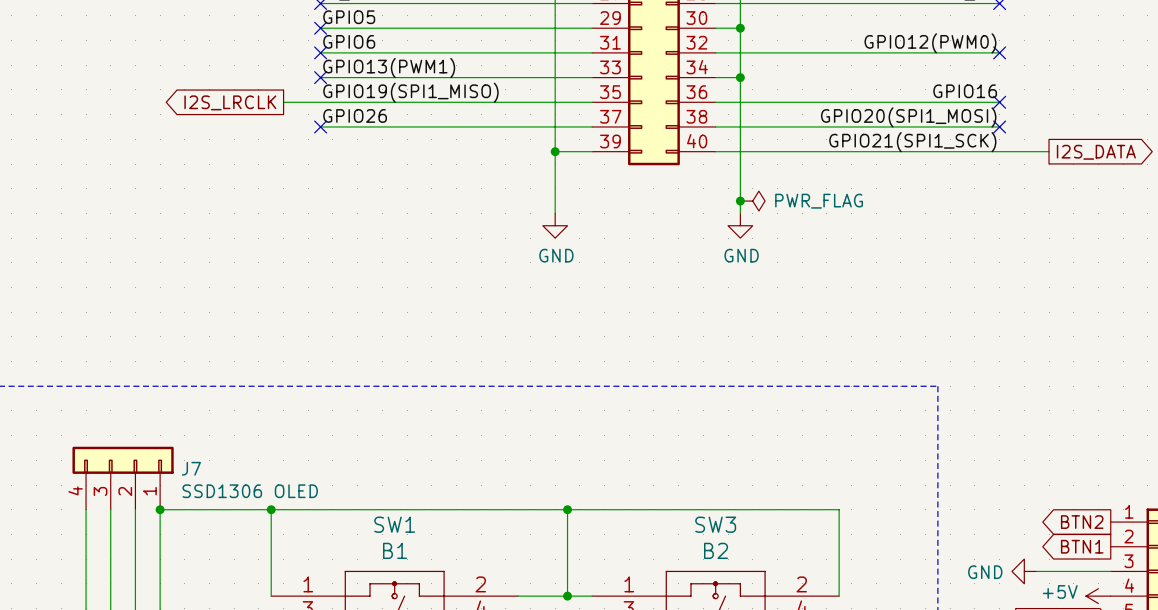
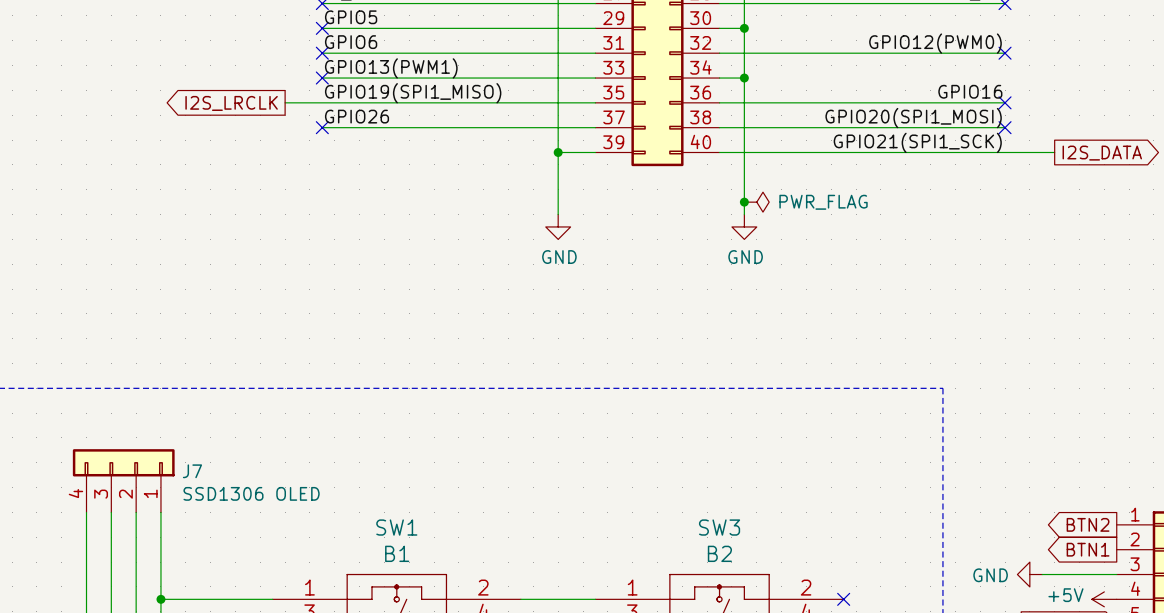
wire: (160, 509) (839, 509) (839, 596) -> none
junction: (160, 509) -> none
wire: (271, 509) (271, 596) -> (160, 599) (272, 599)
junction: (271, 509) -> none
wire: (567, 509) (567, 596) -> none
junction: (567, 509) -> none
junction: none -> (160, 599)
junction: (567, 596) -> none
no-connect mark: none -> (843, 599)

